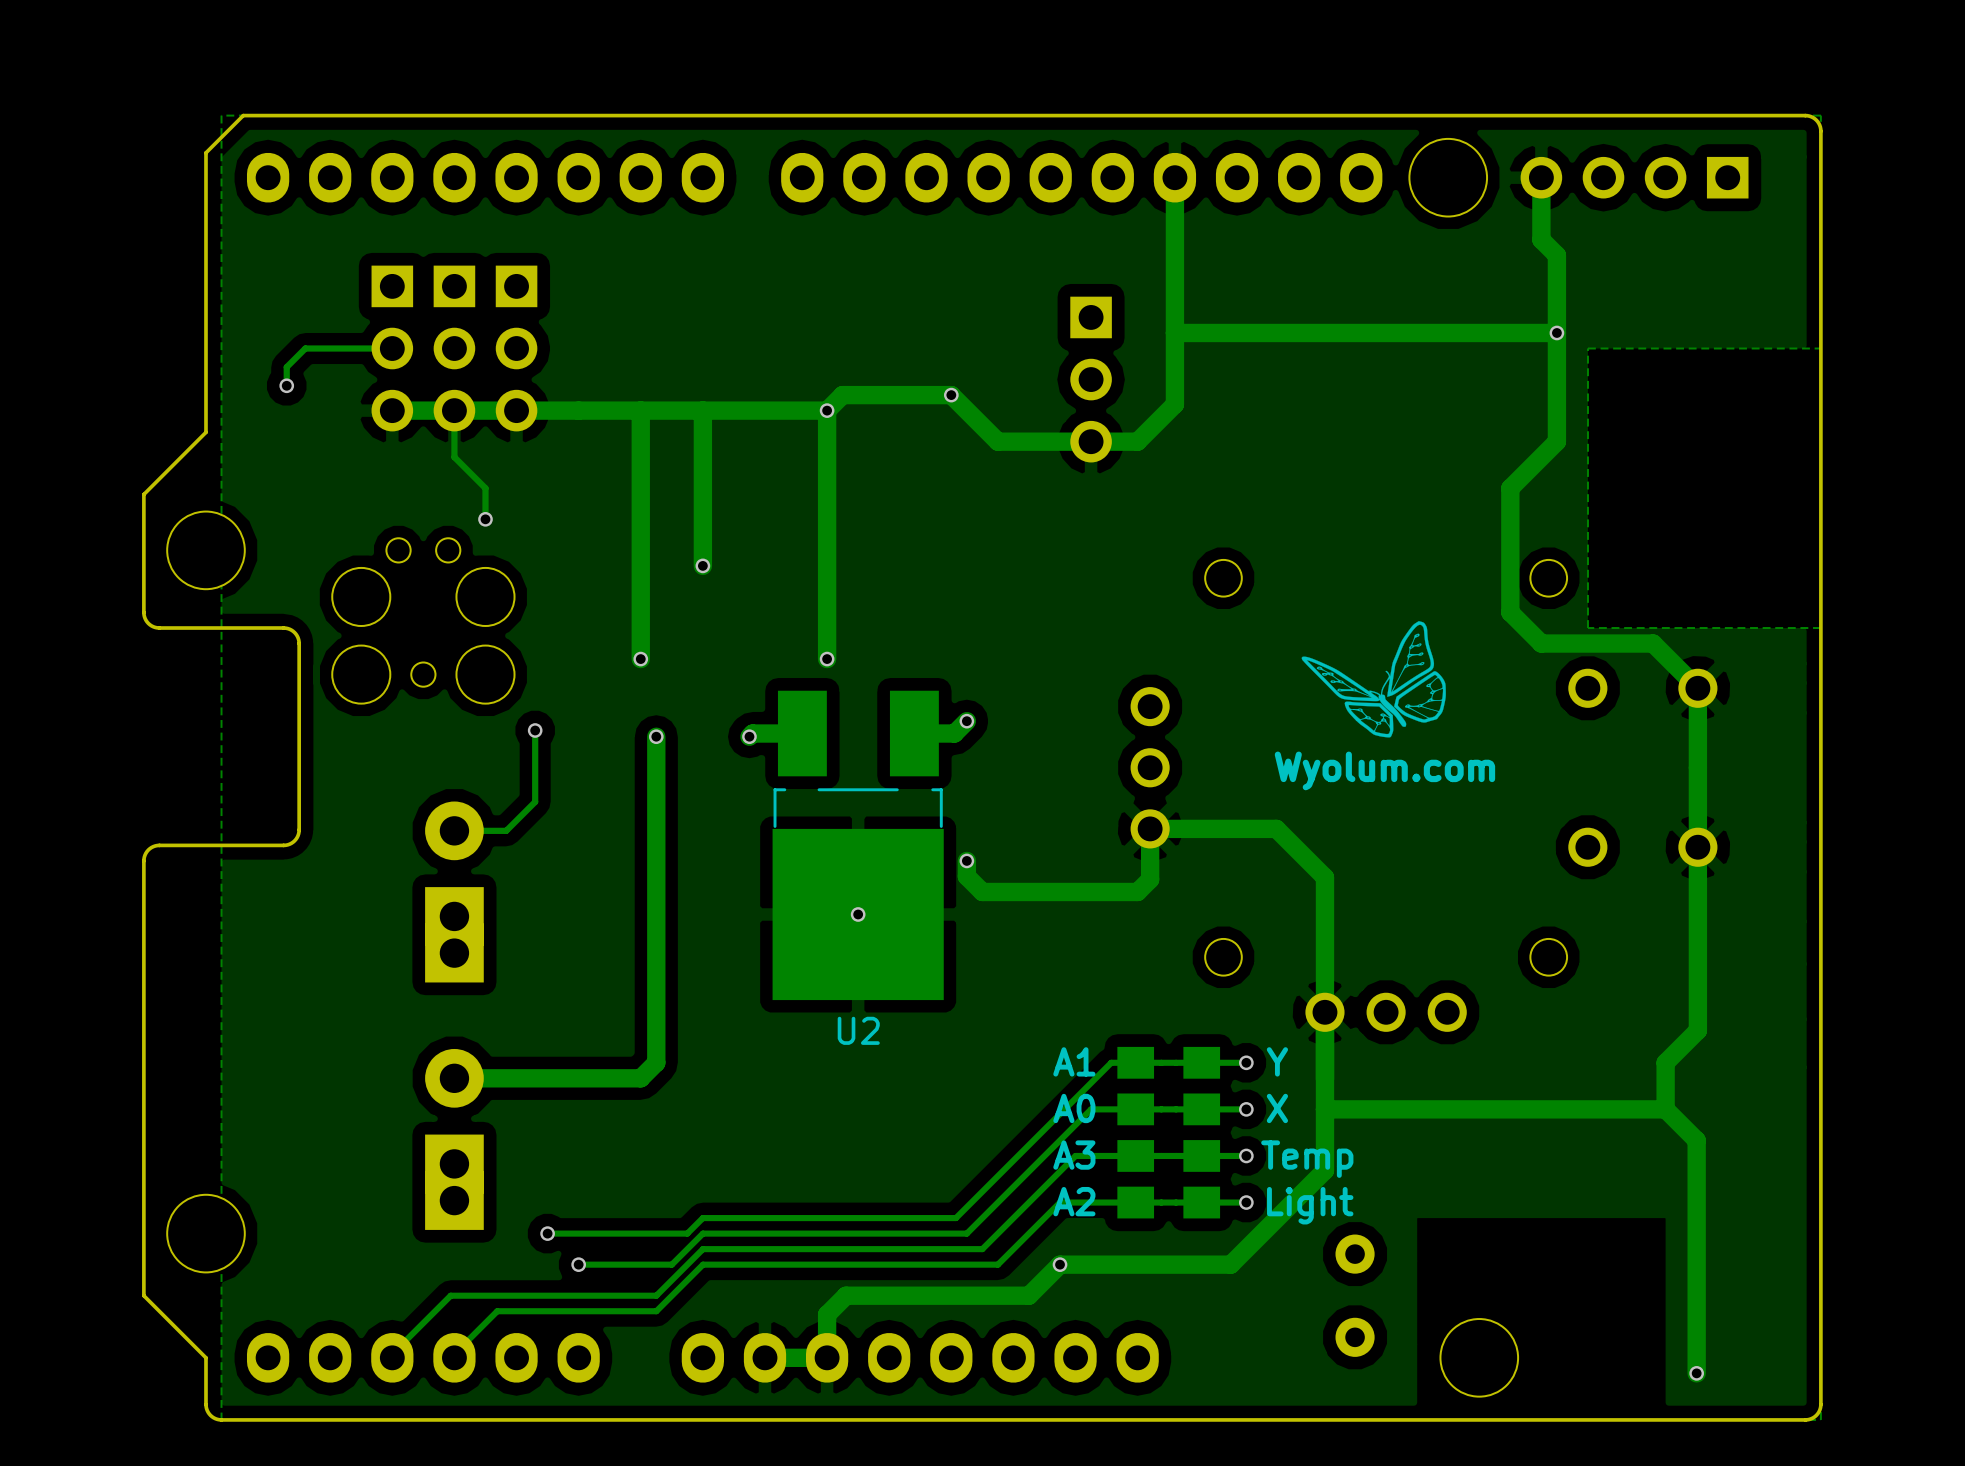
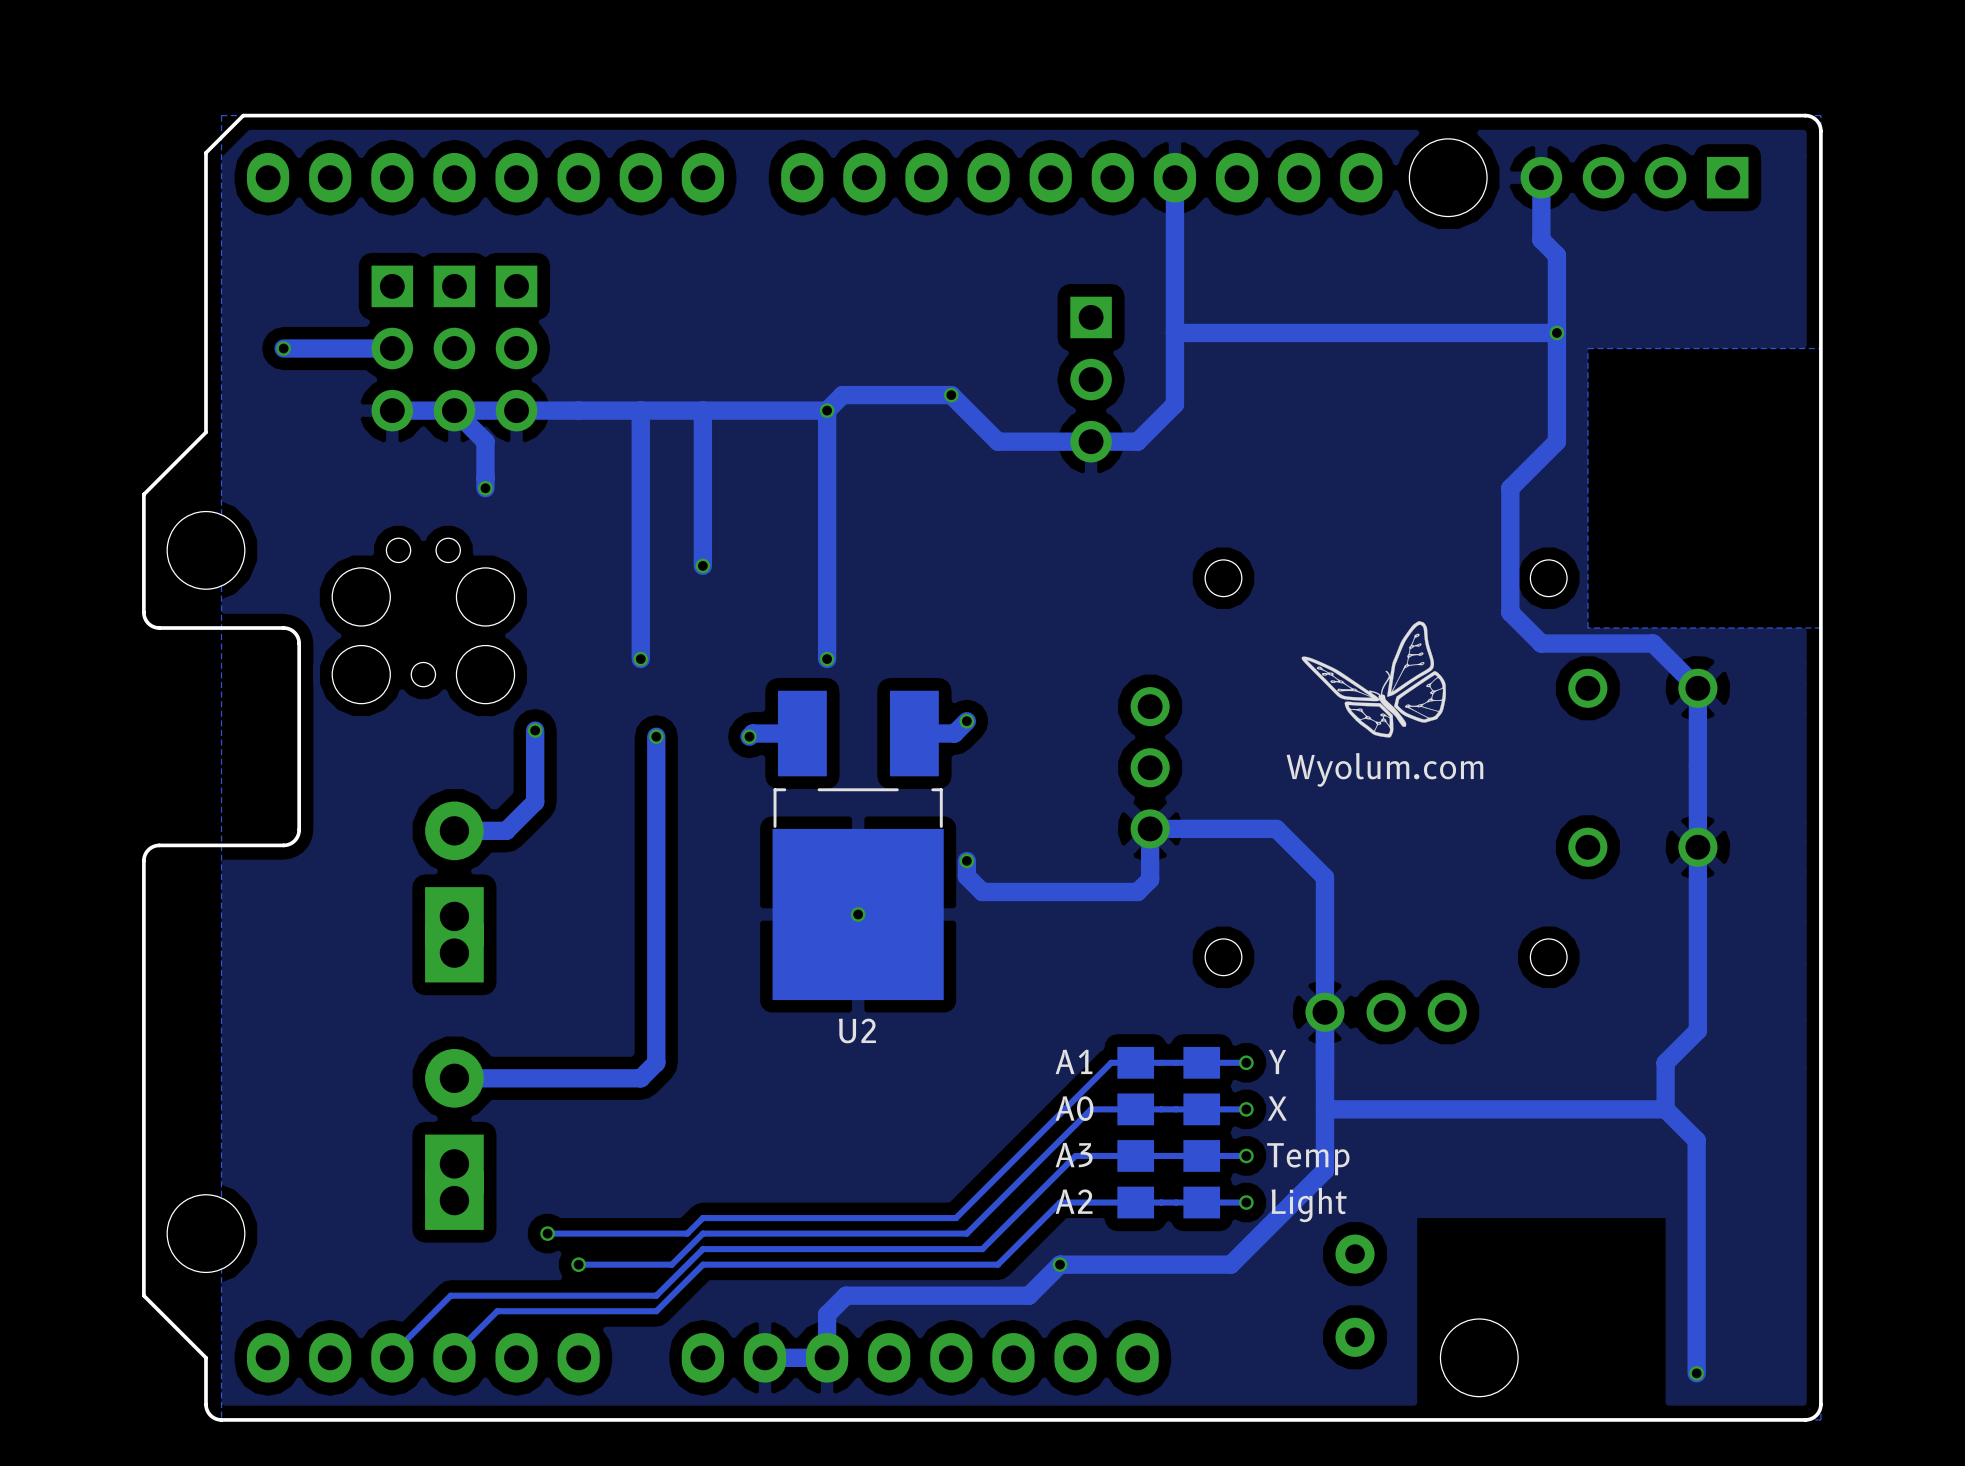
track: (305, 348) (286, 367) (286, 385) -> (305, 348) (283, 348)
track width: thin (392, 348) (305, 348) -> thick (392, 348) (305, 348)
via position: (286, 385) -> (283, 348)
track: (454, 410) (454, 457) (485, 488) (485, 519) -> (454, 410) (485, 441) (485, 488)
via position: (485, 519) -> (485, 488)
track width: thin (535, 730) (535, 801) (506, 830) (454, 830) -> thick (535, 730) (535, 801) (506, 830) (454, 830)

